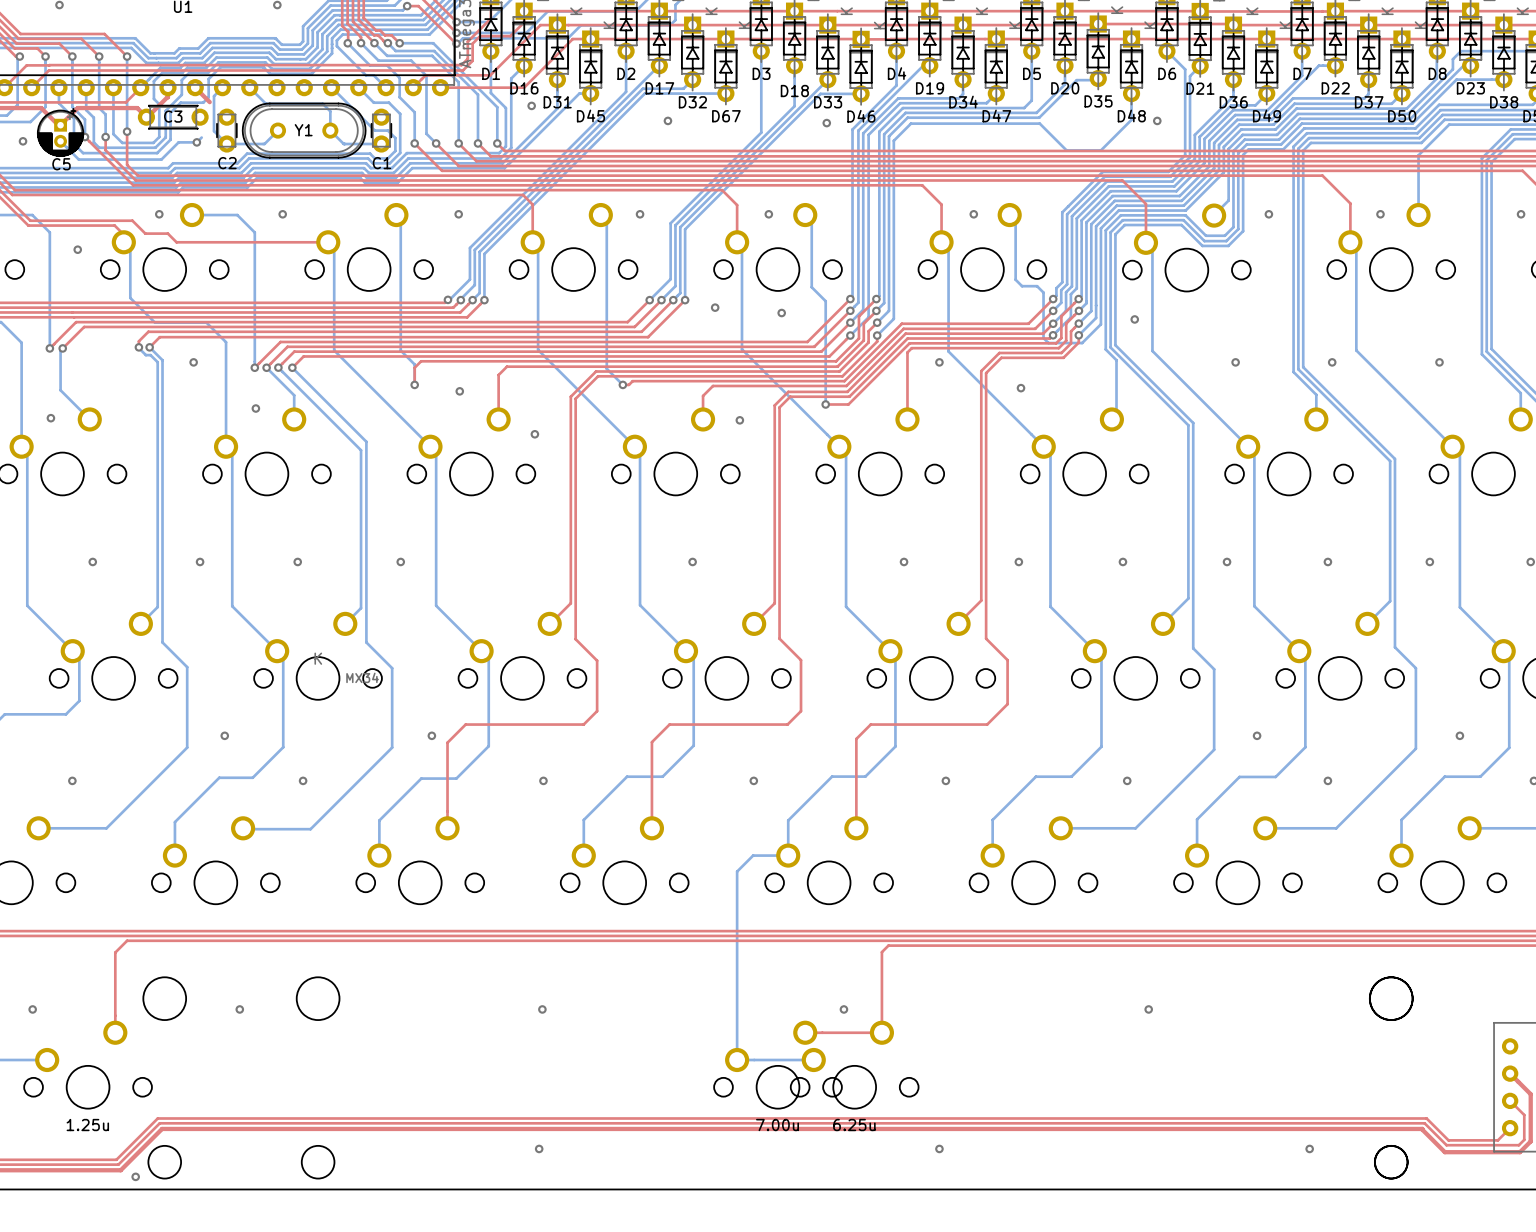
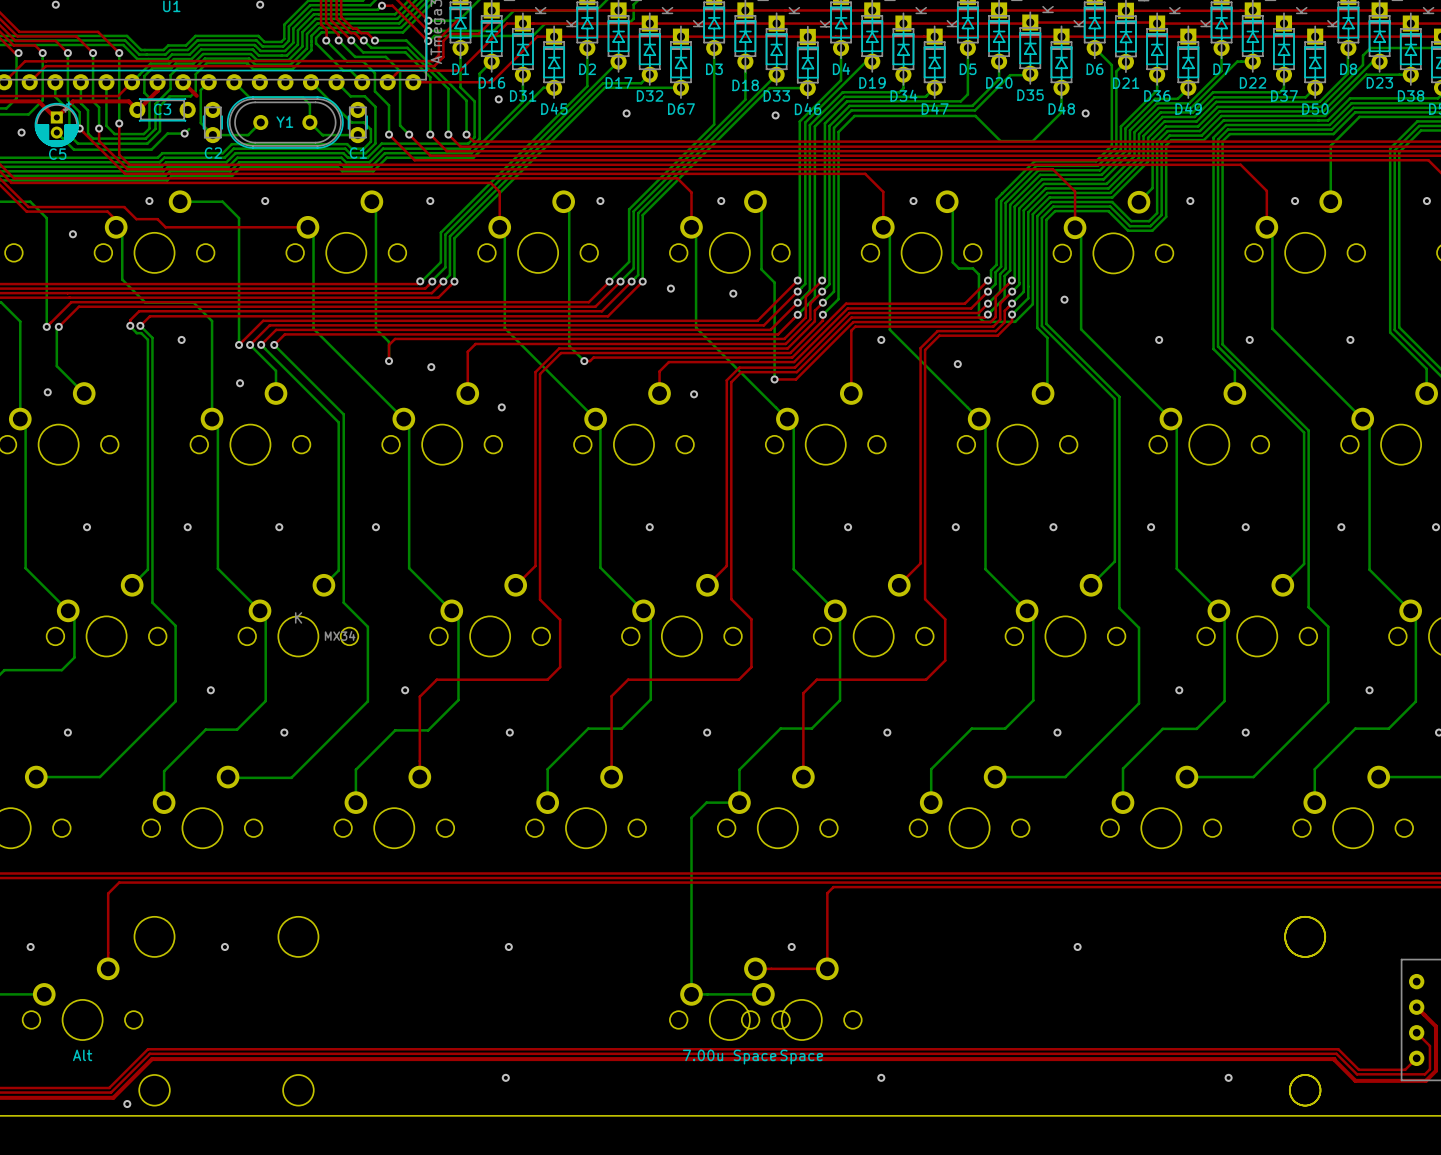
part value: 1.25u (87, 1125) -> Alt (82, 1055)
part value: 7.00u (777, 1125) -> 7.00u Space (729, 1057)
part value: 6.25u (854, 1125) -> Space (801, 1057)

